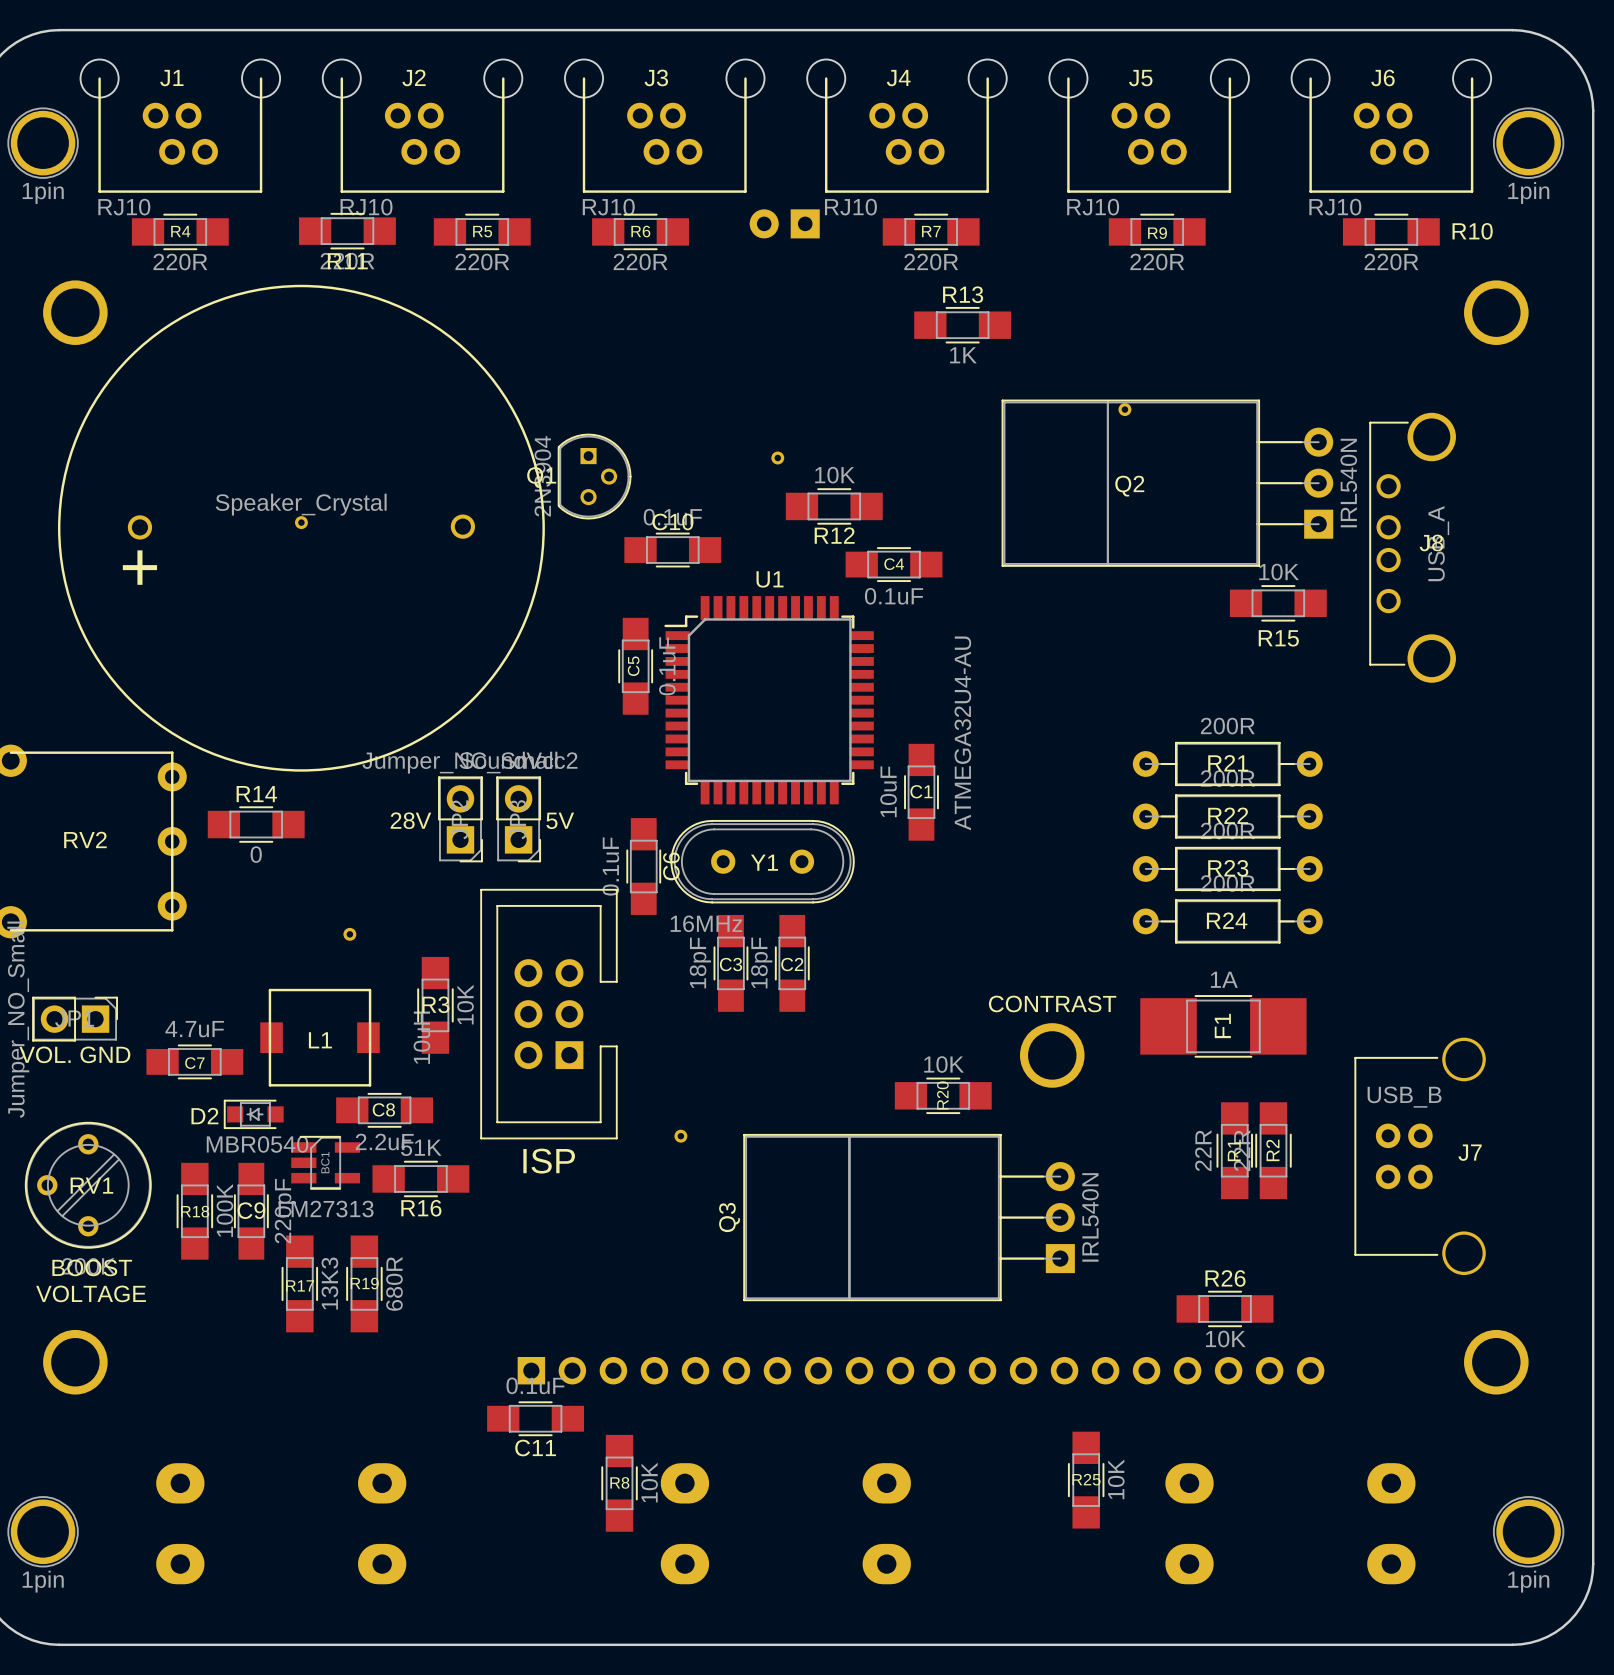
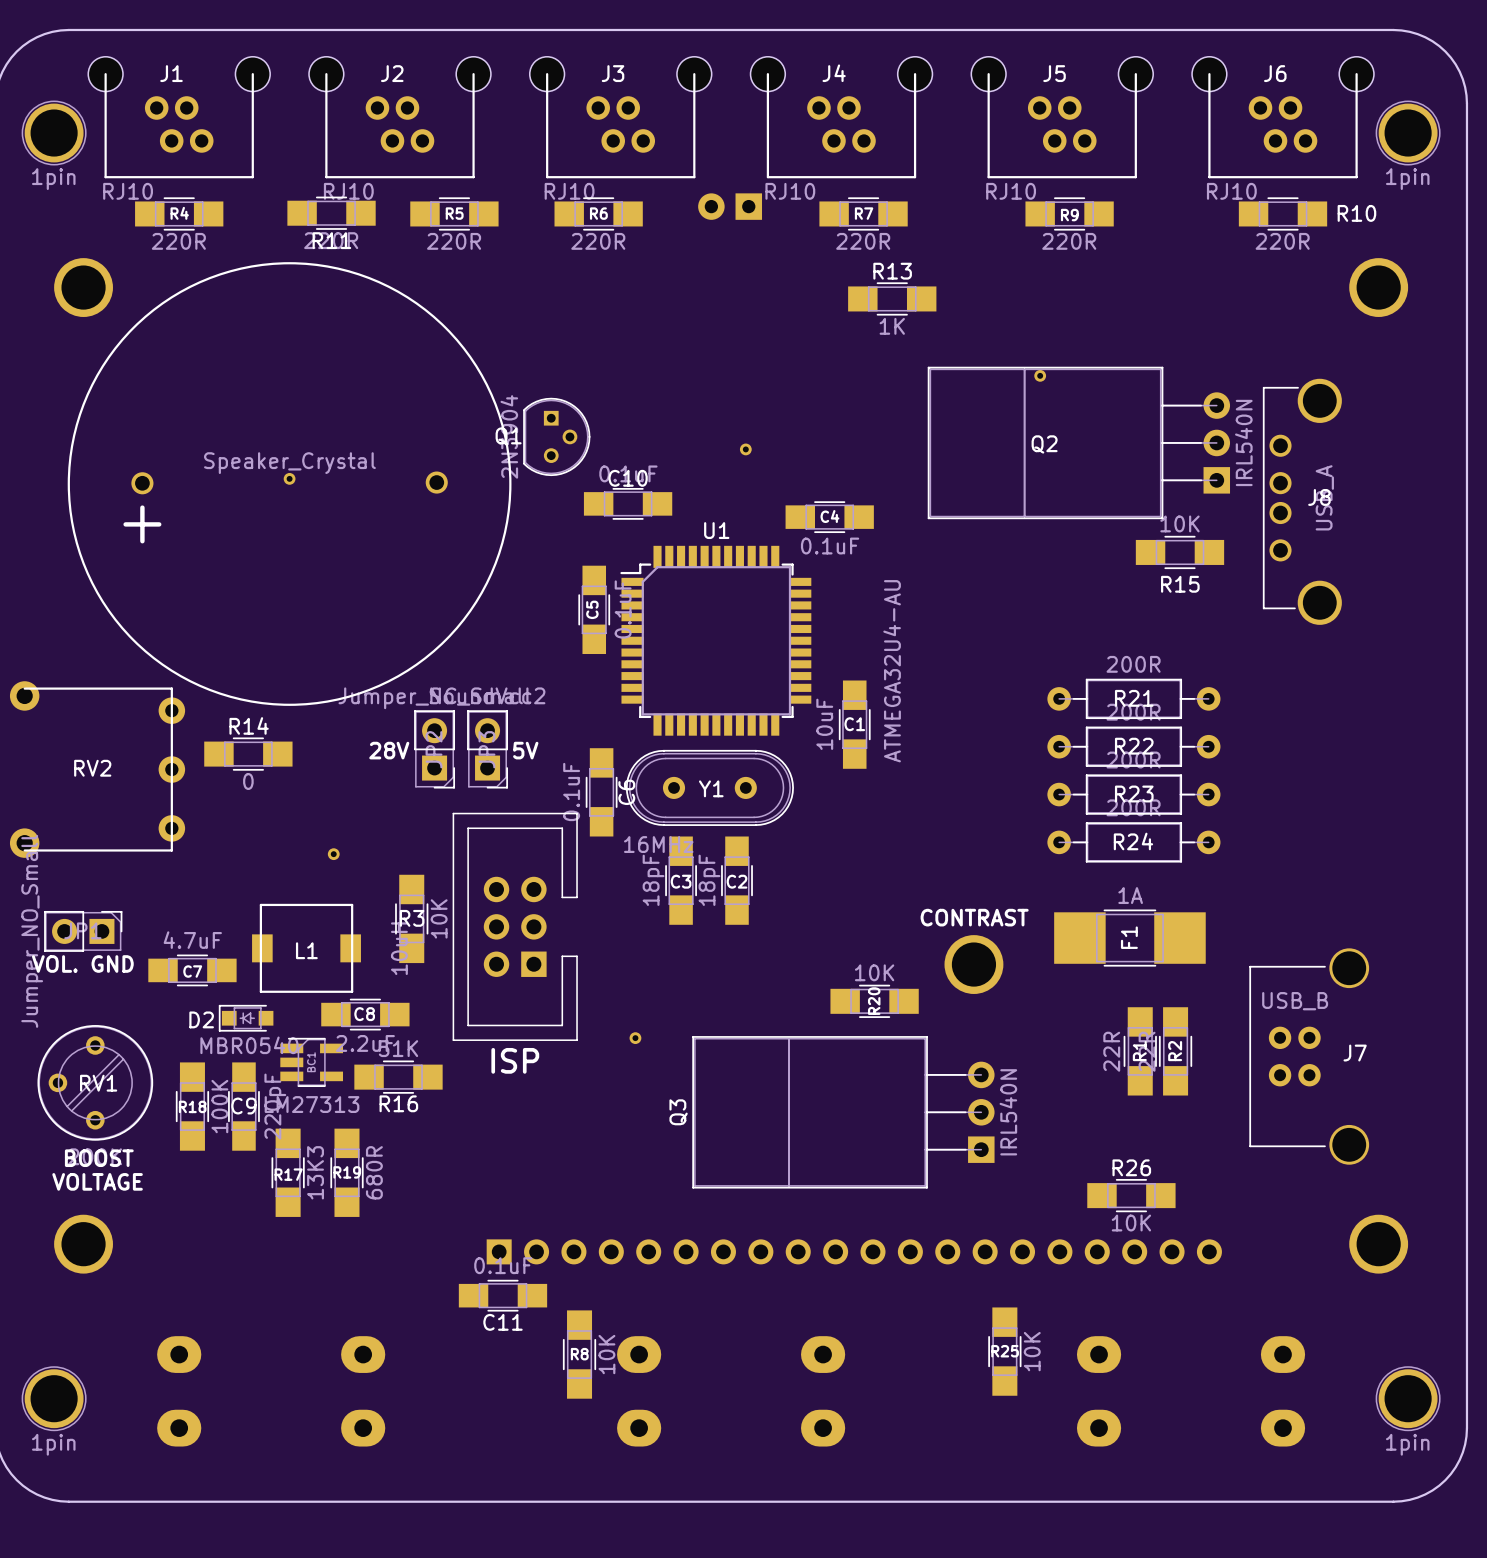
part position: (777, 458) -> (745, 449)
R12: 10K (834, 506) -> none

